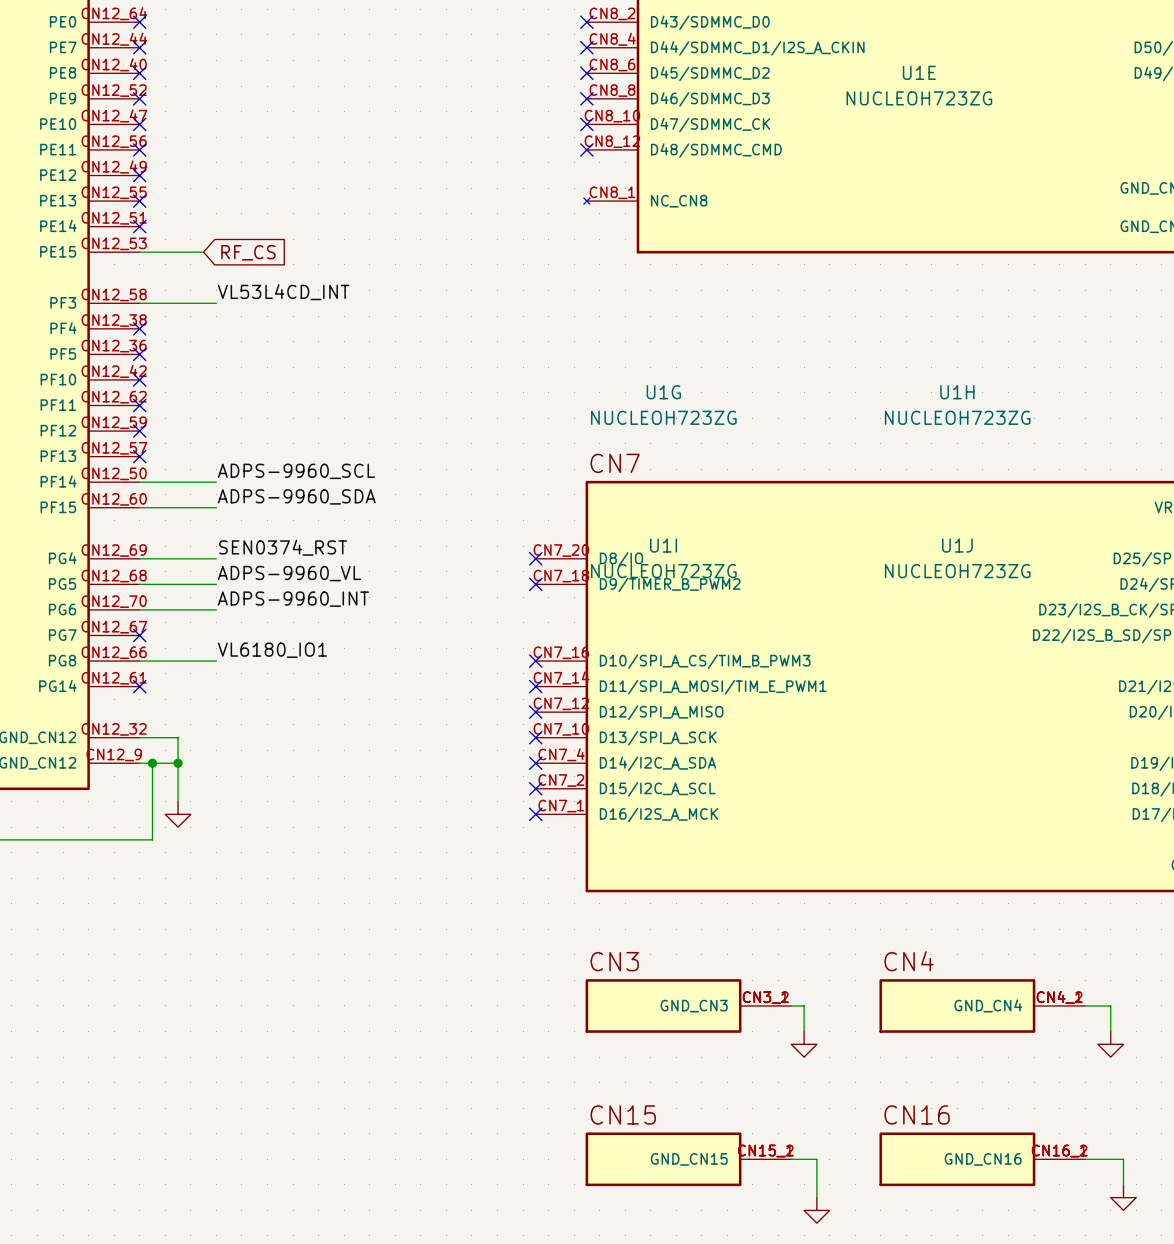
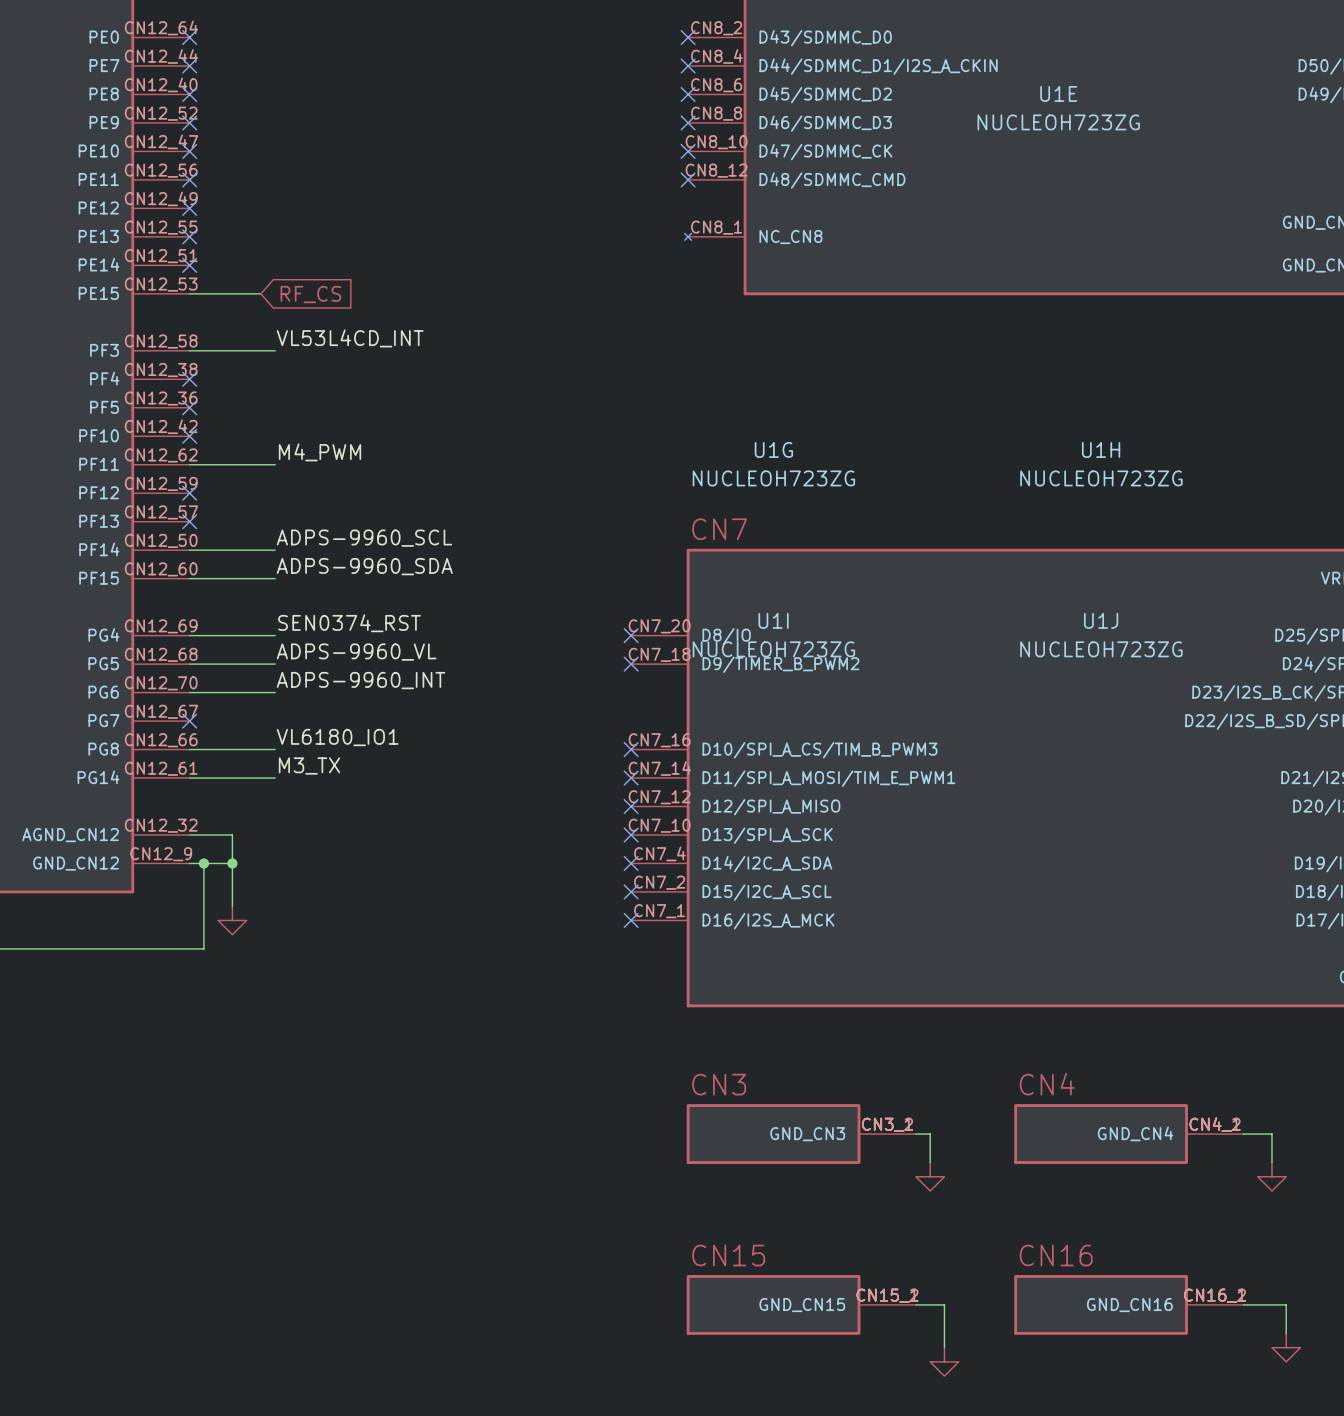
label: none -> M4_PWM (319, 452)
wire: none -> (189, 464) (275, 464)
no-connect mark: (139, 405) -> none
label: none -> M3_TX (309, 766)
wire: none -> (189, 778) (275, 778)
no-connect mark: (139, 686) -> none

